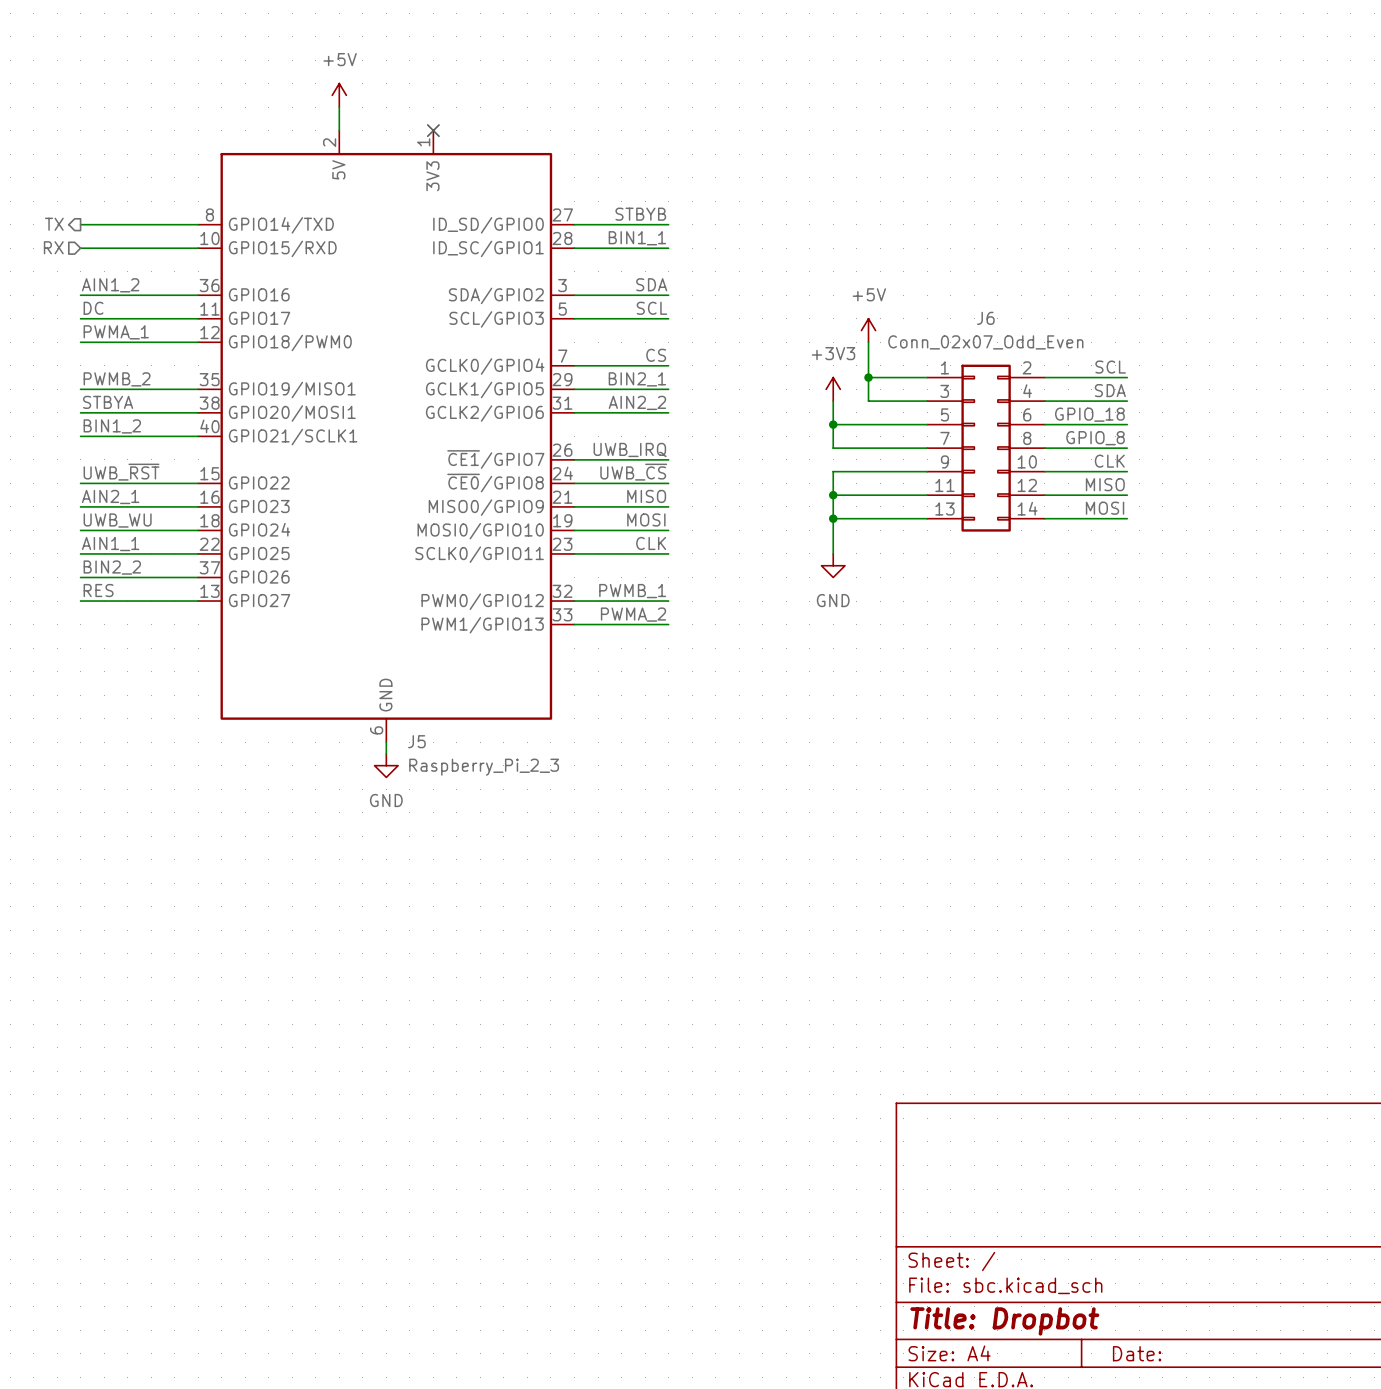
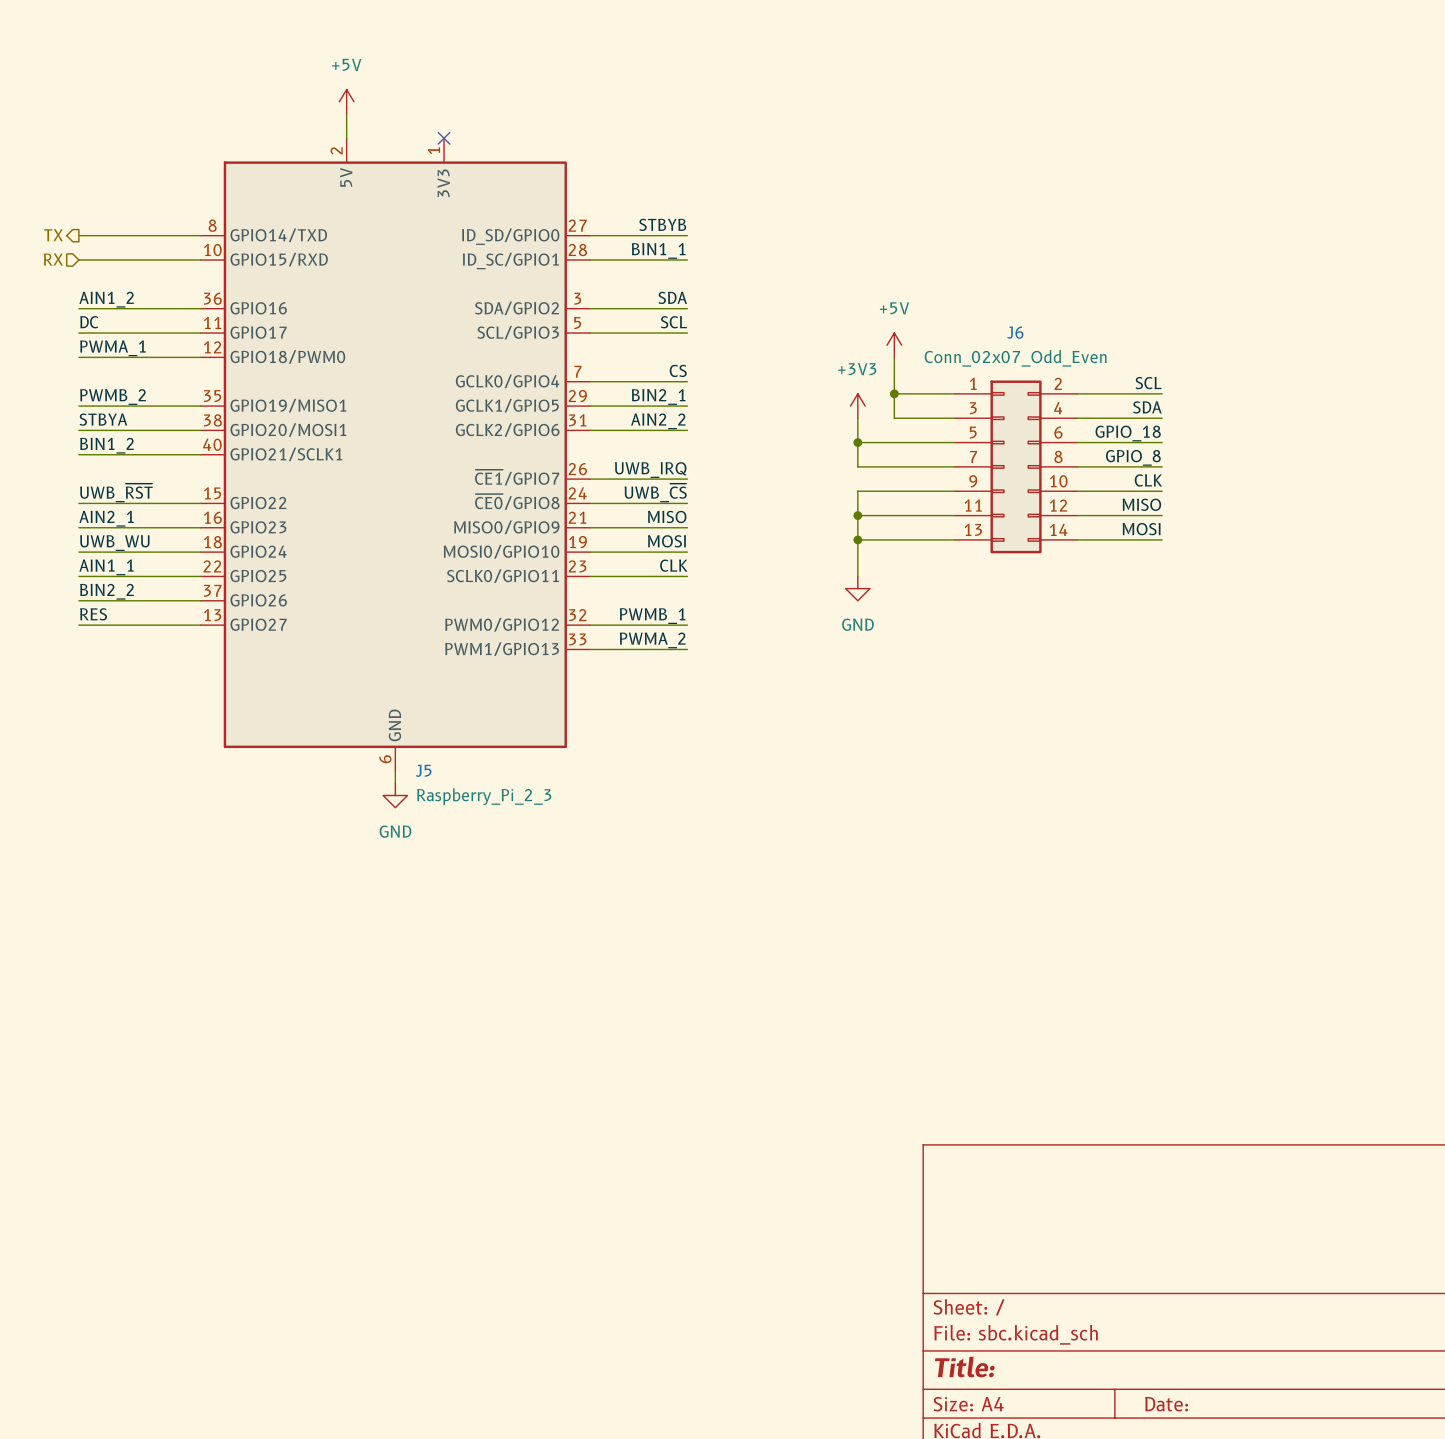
title block: Title: Dropbot (1004, 1321) -> Title: (964, 1366)

